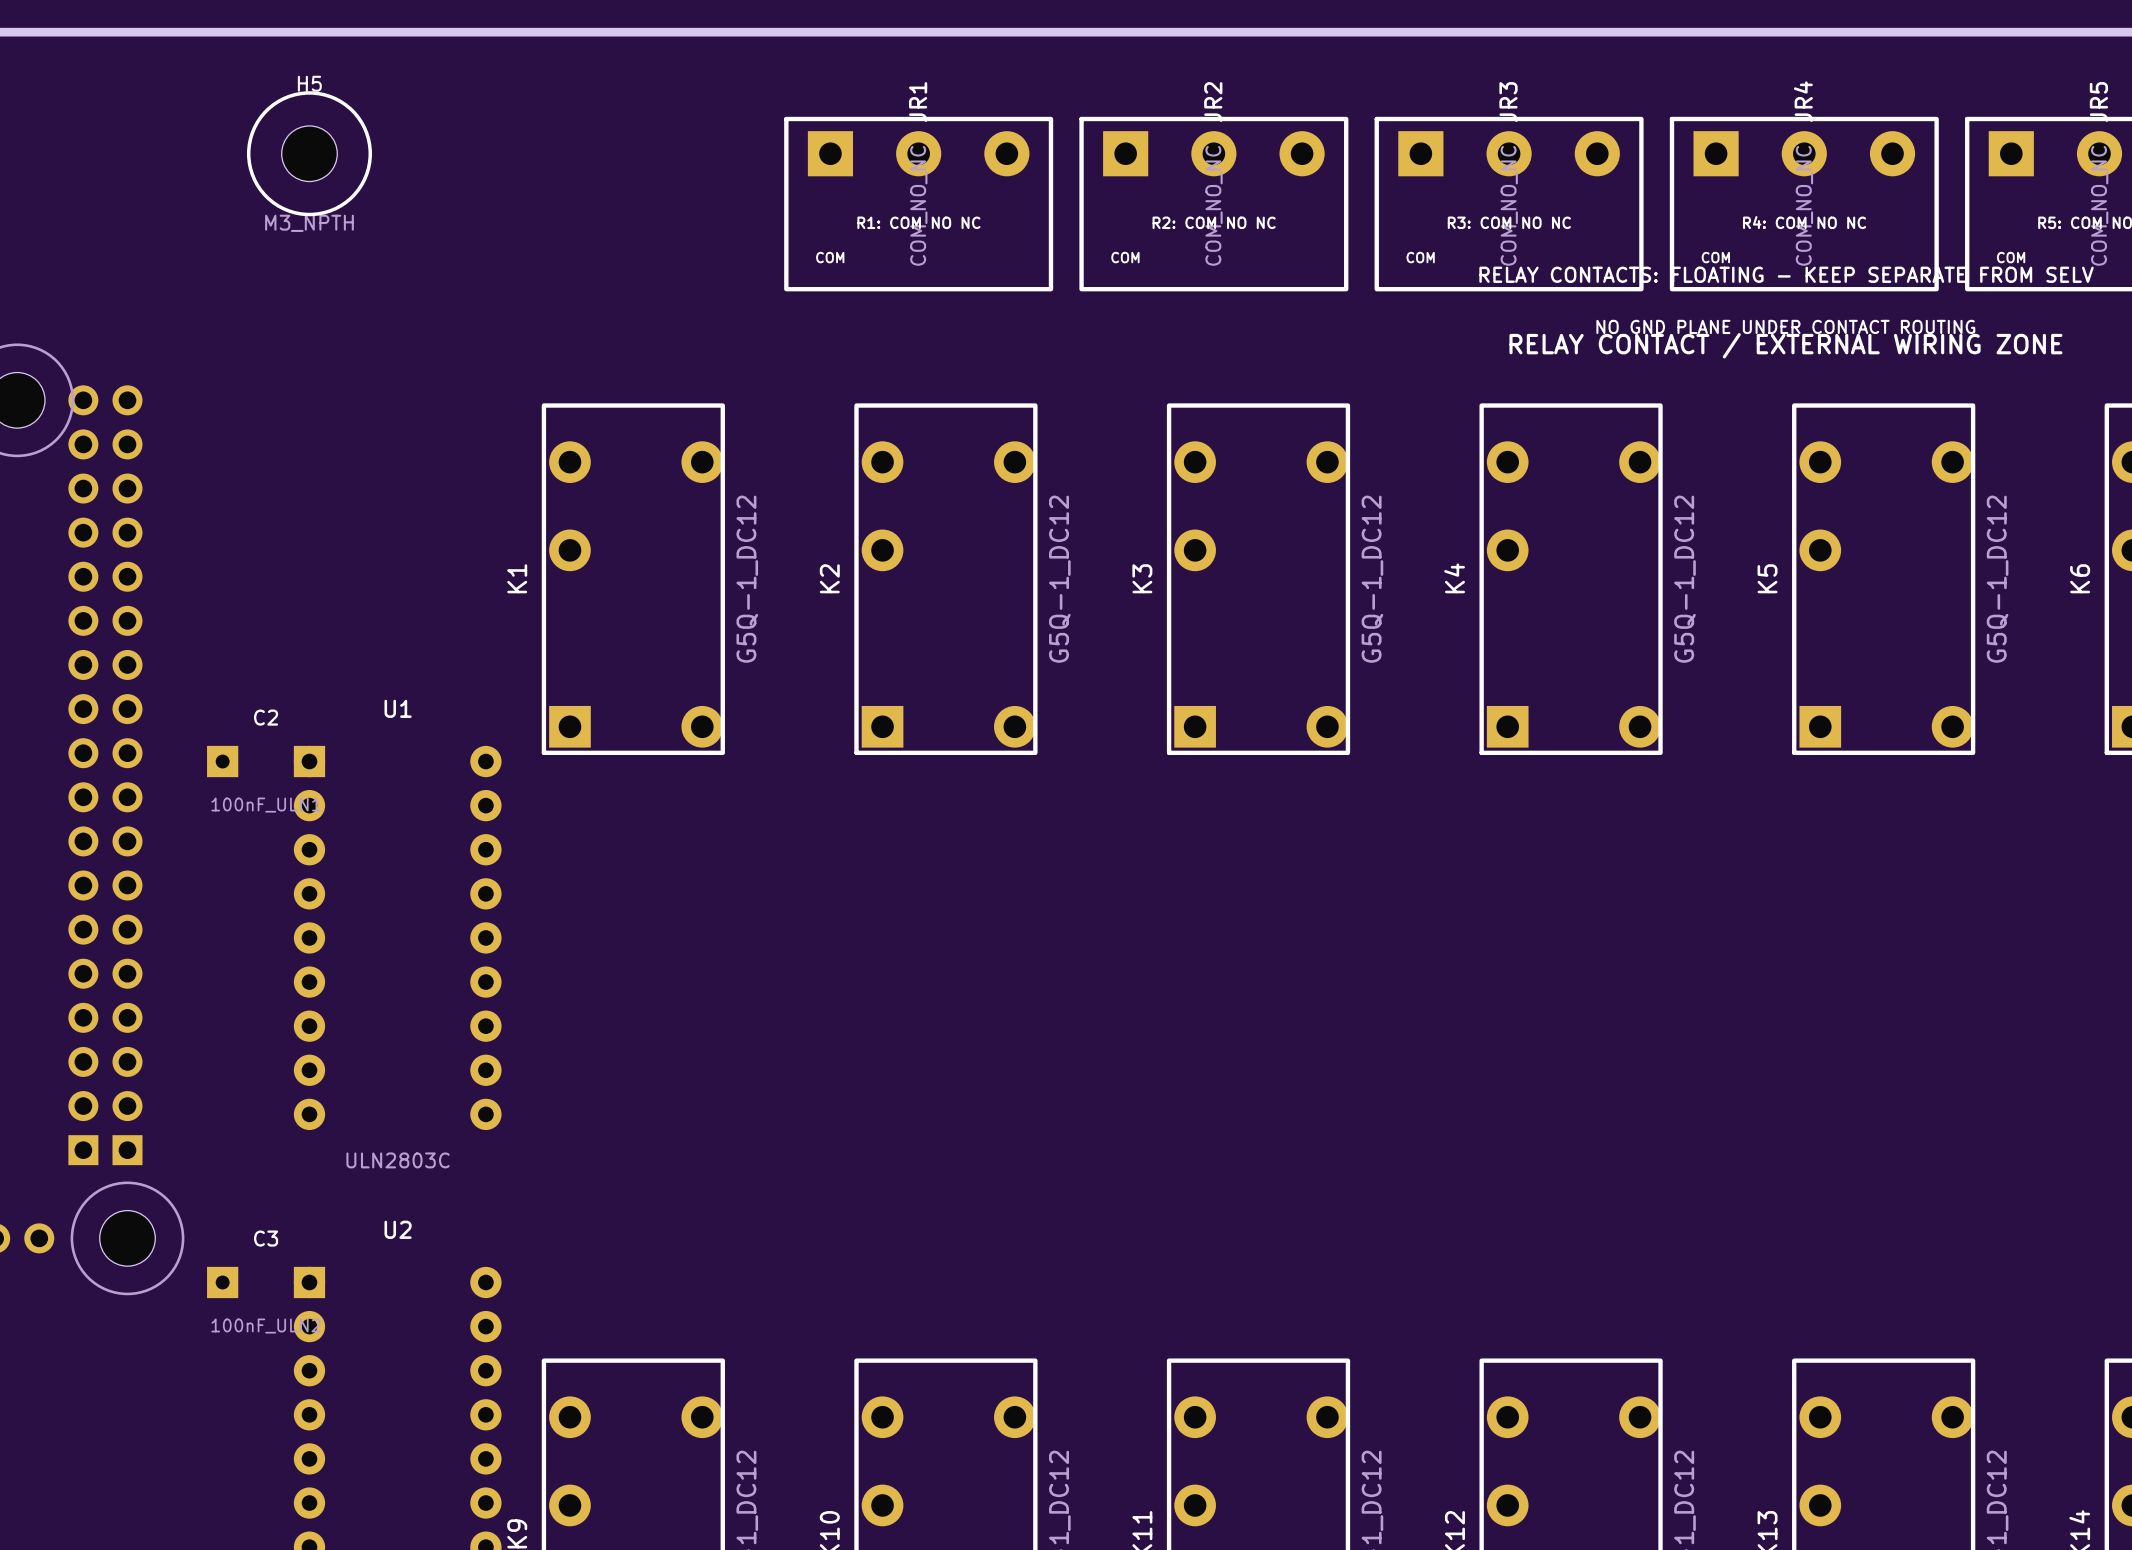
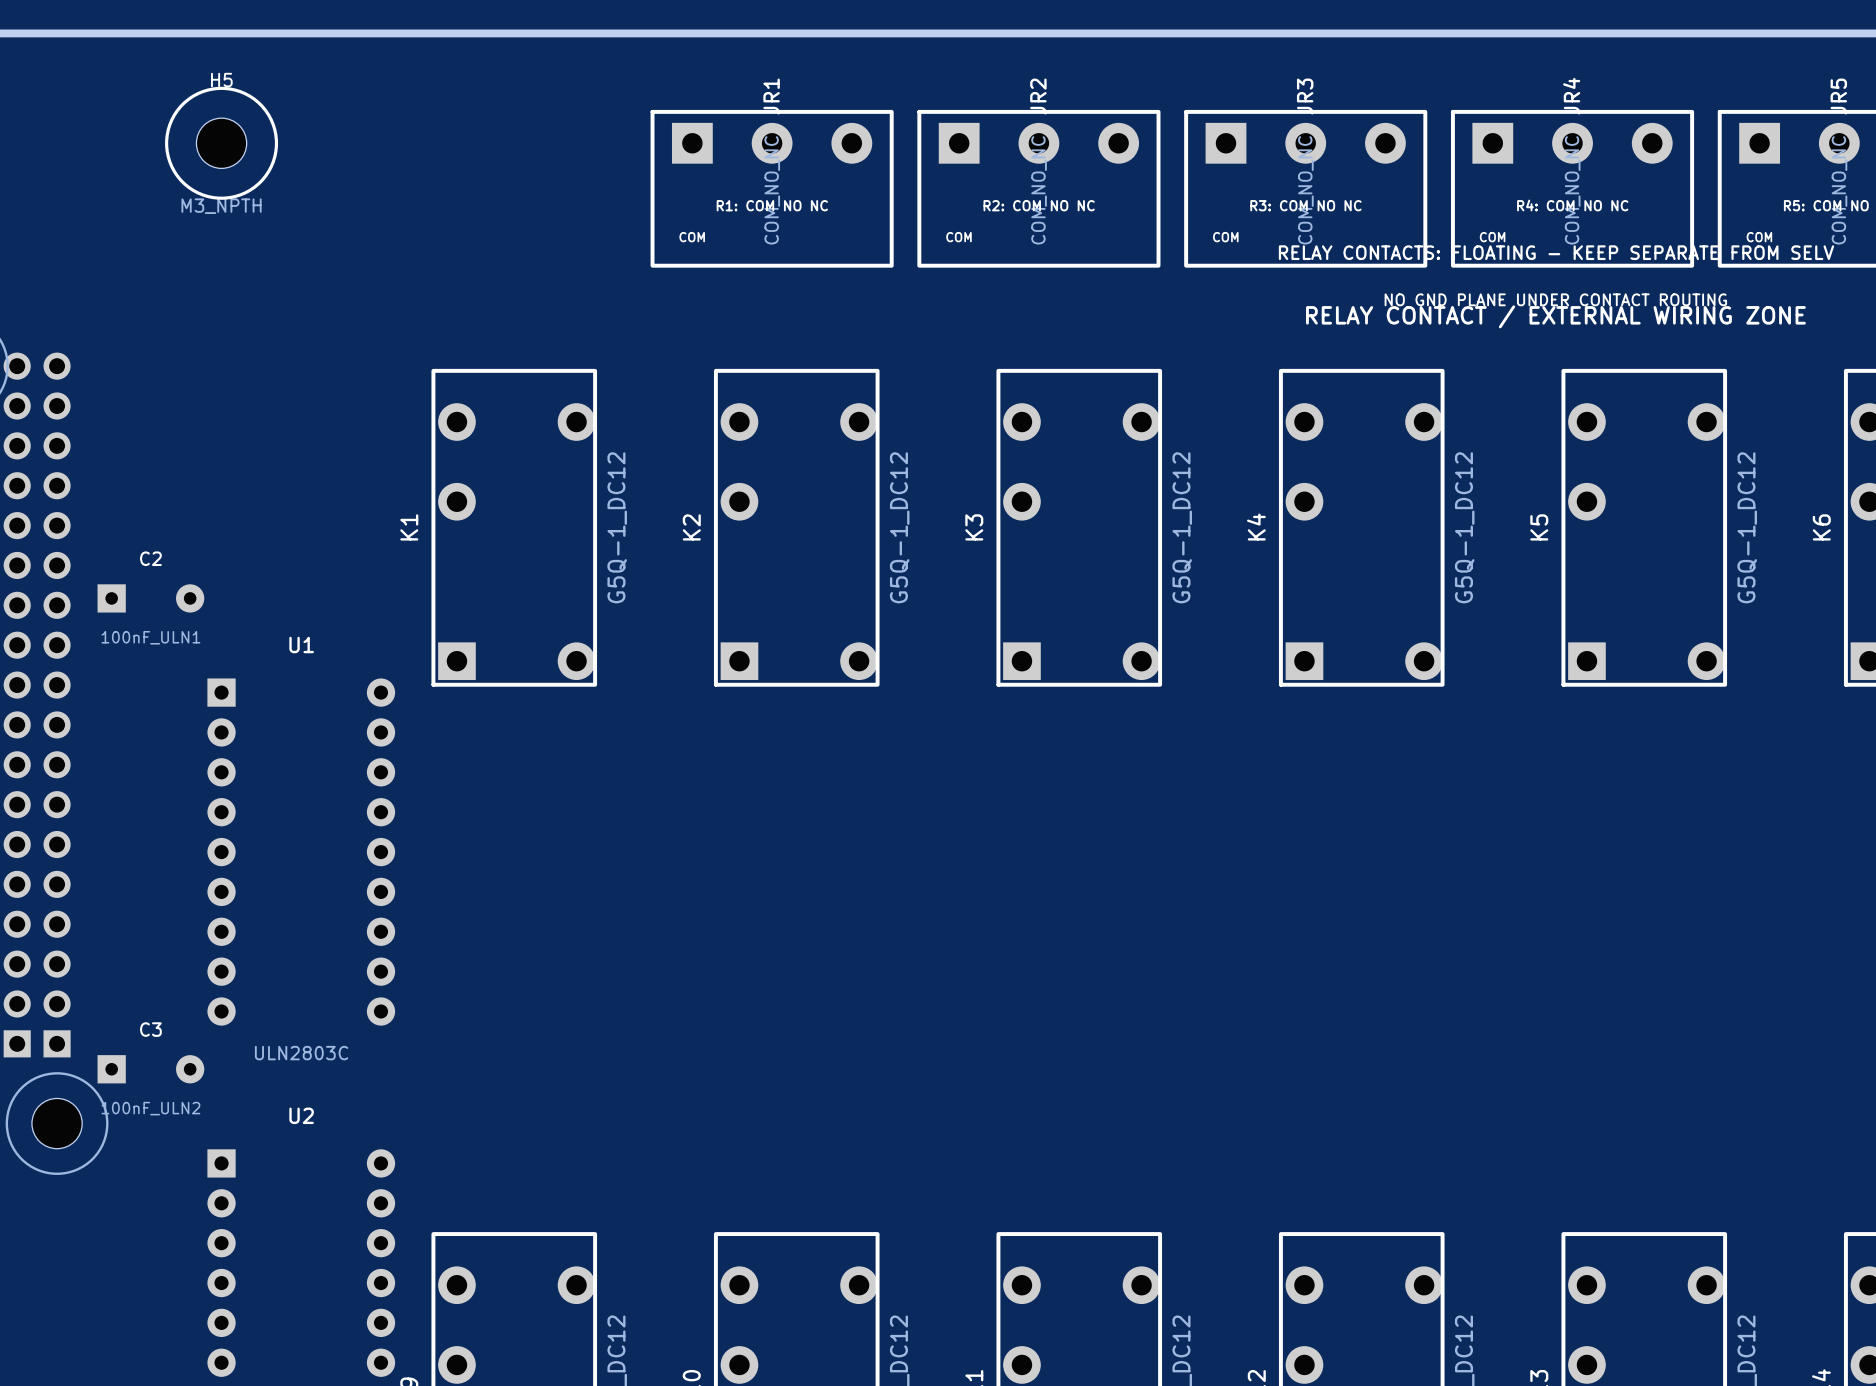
C2 position: (266, 761) -> (150, 598)
C3 position: (266, 1282) -> (150, 1069)

